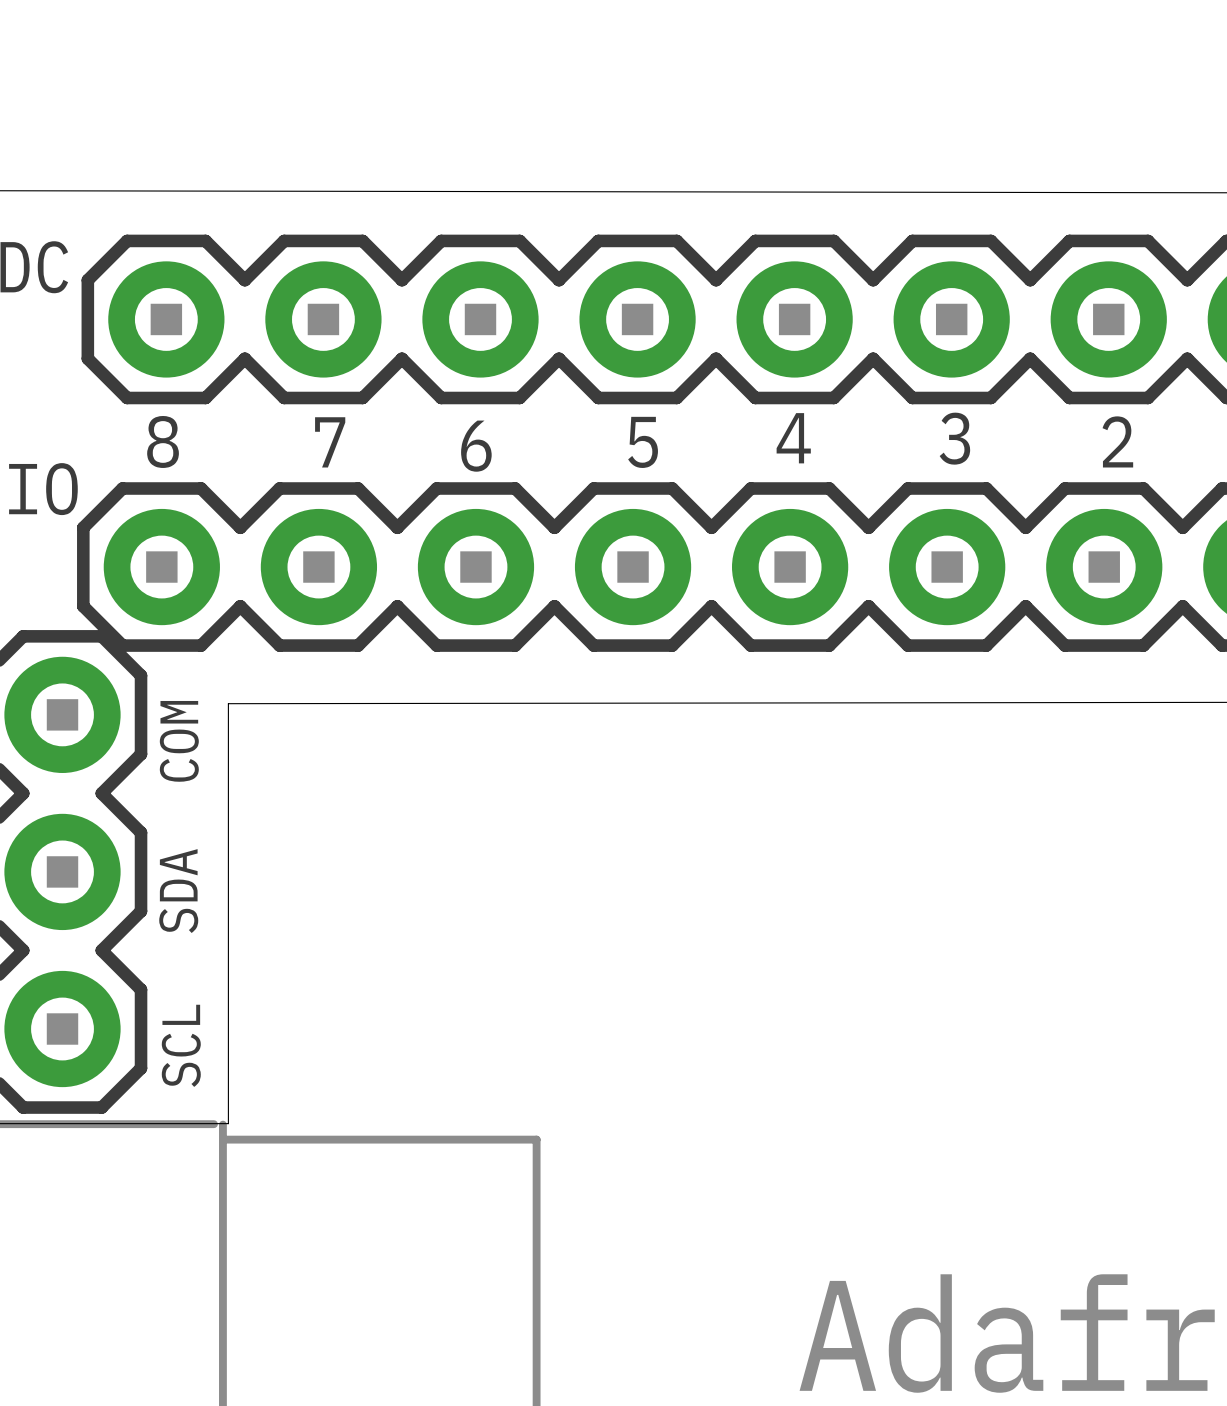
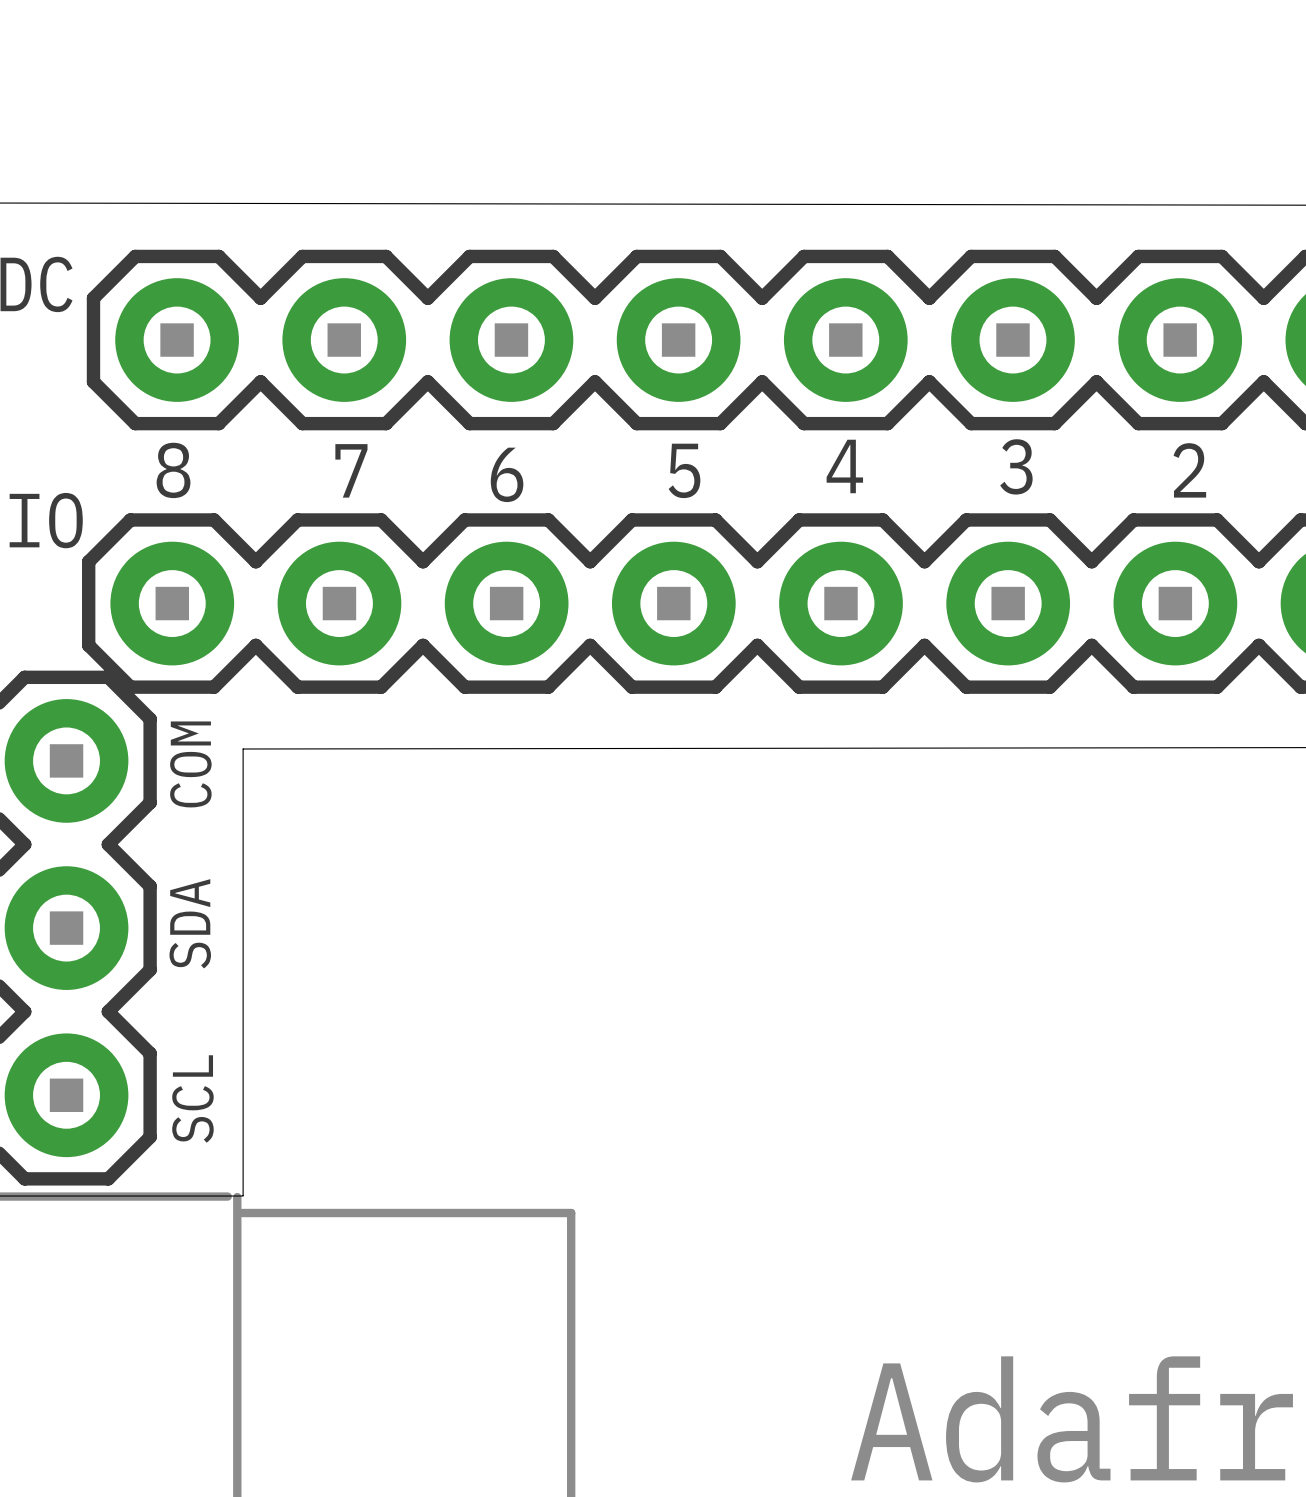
text position: COM (179, 741) -> COM (190, 764)
text position: SDA (178, 891) -> SDA (190, 923)
text position: SCL (181, 1045) -> SCL (192, 1098)

